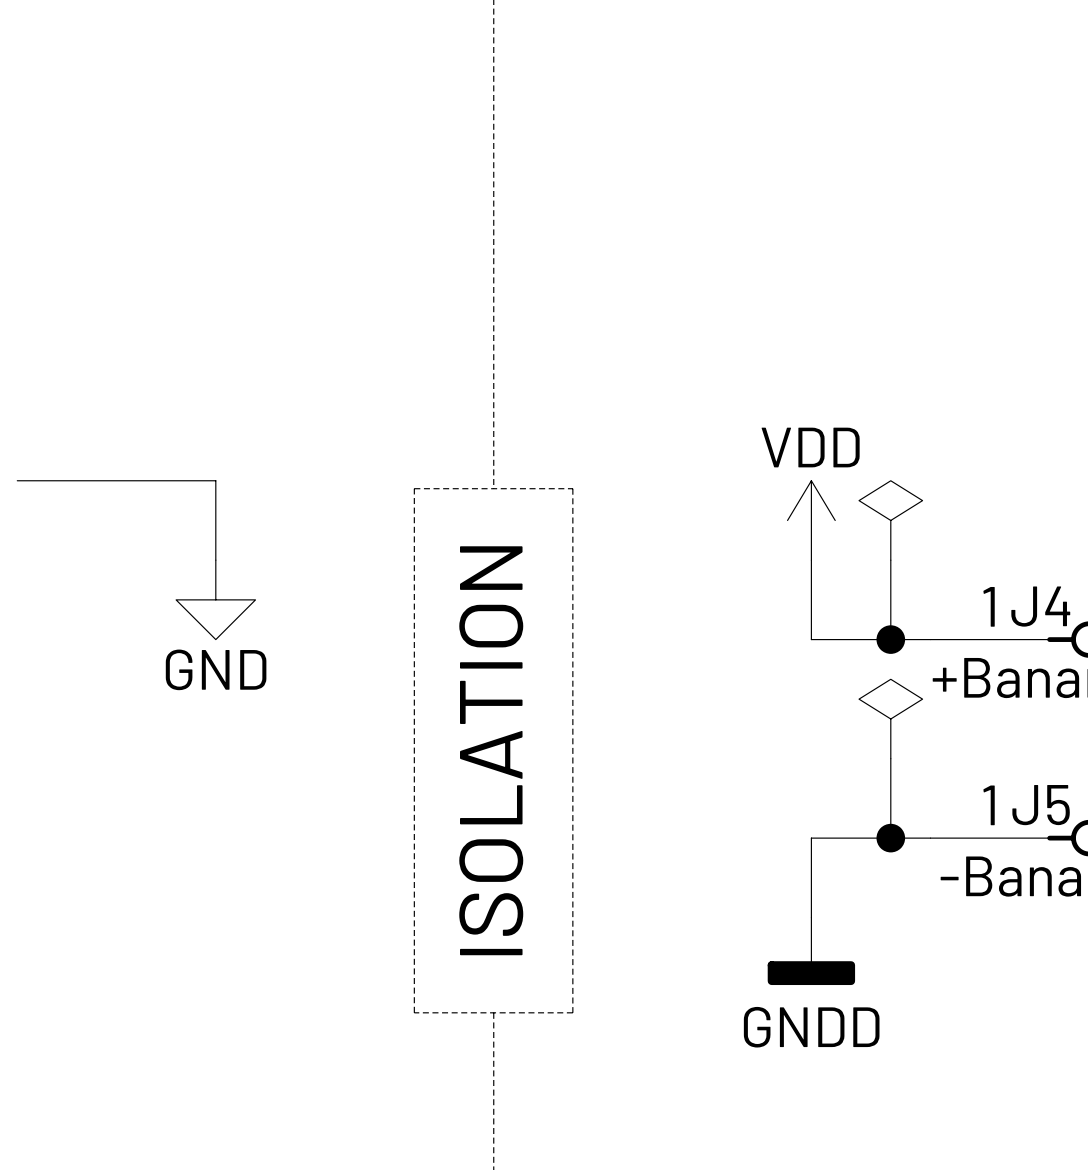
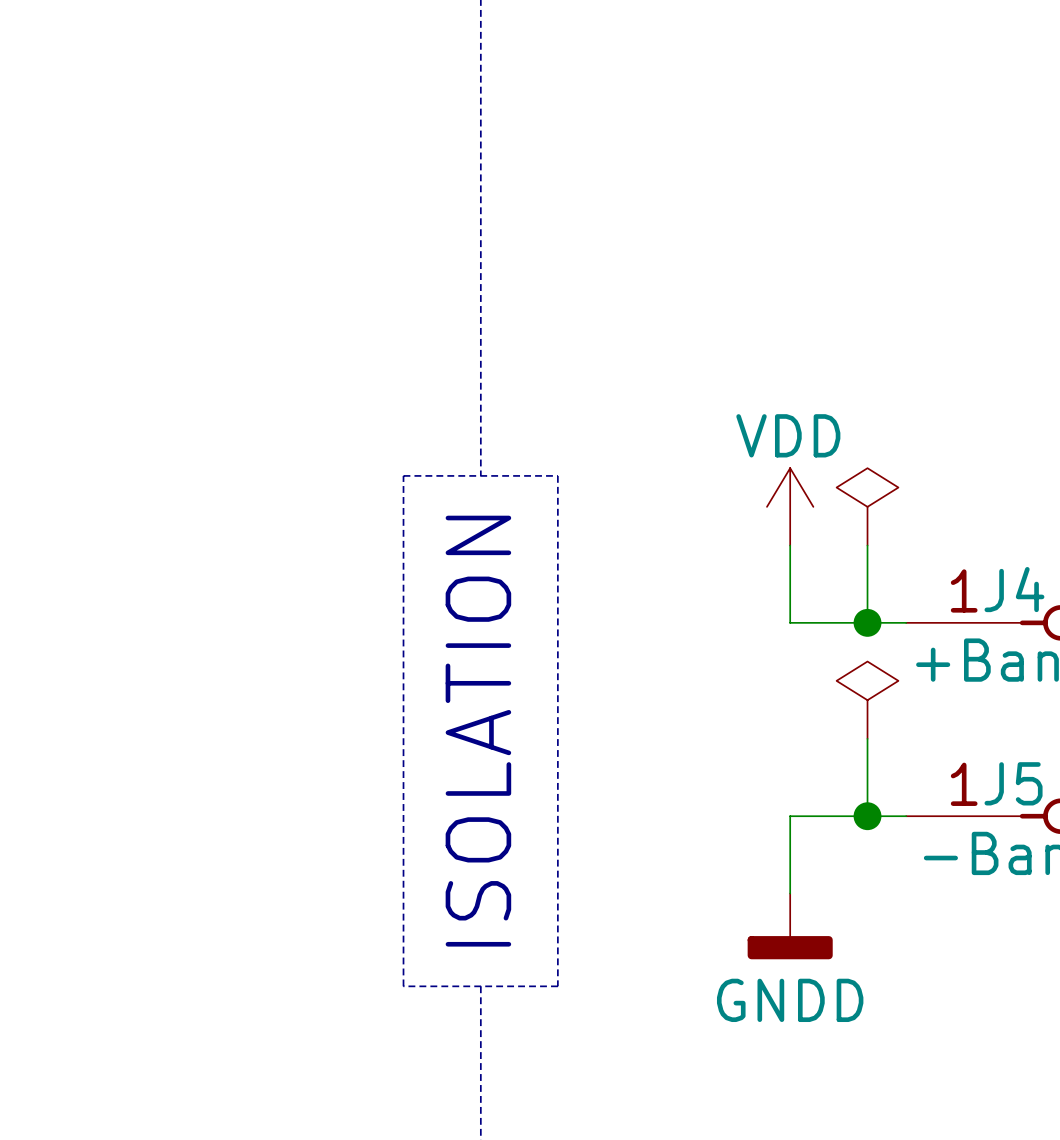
wire: (17, 480) (215, 480) (215, 560) -> none
power symbol: GND (215, 599) -> none

